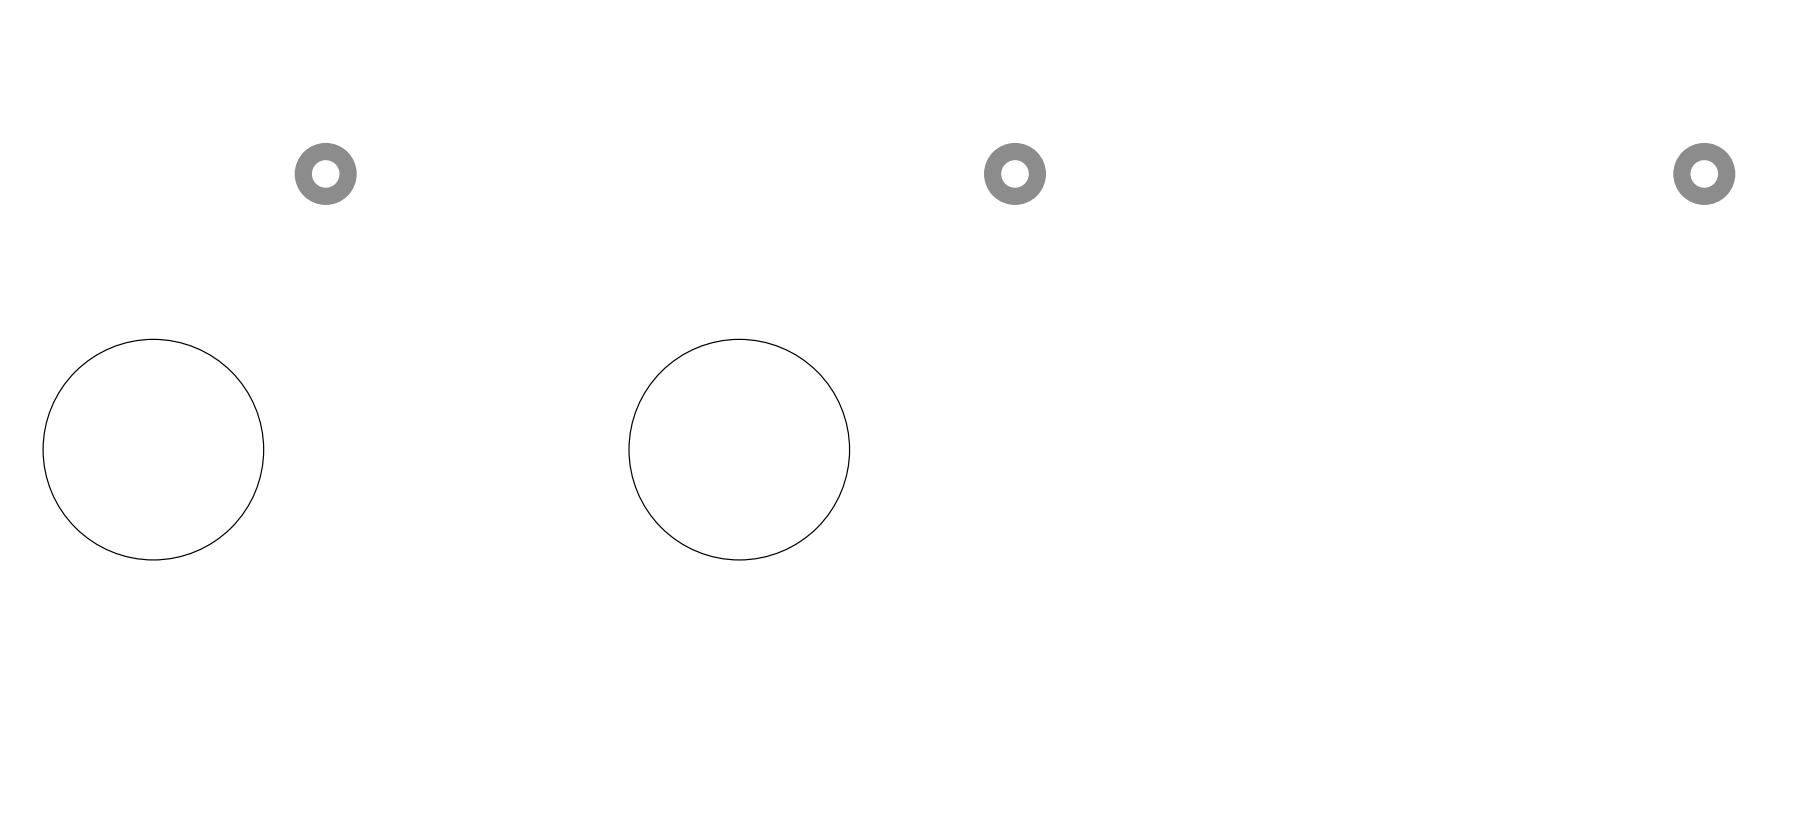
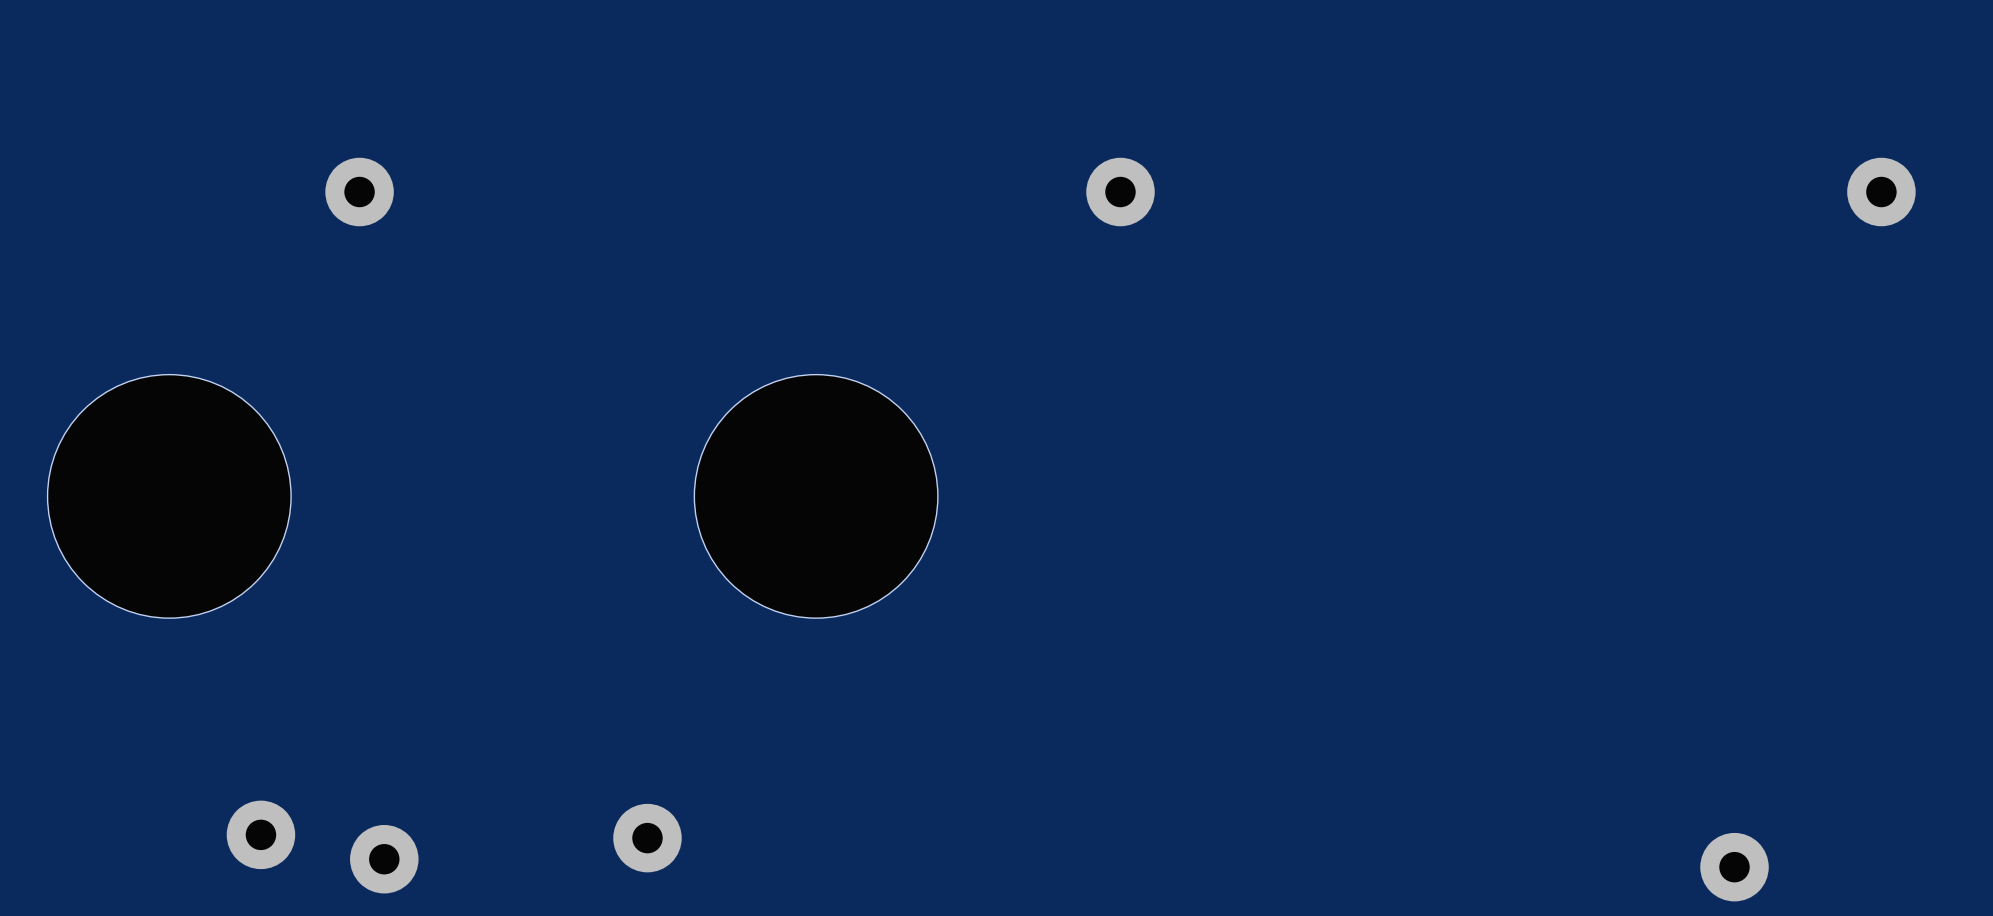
via: none -> (260, 834)
via: none -> (647, 838)
via: none -> (384, 859)
via: none -> (1734, 867)

